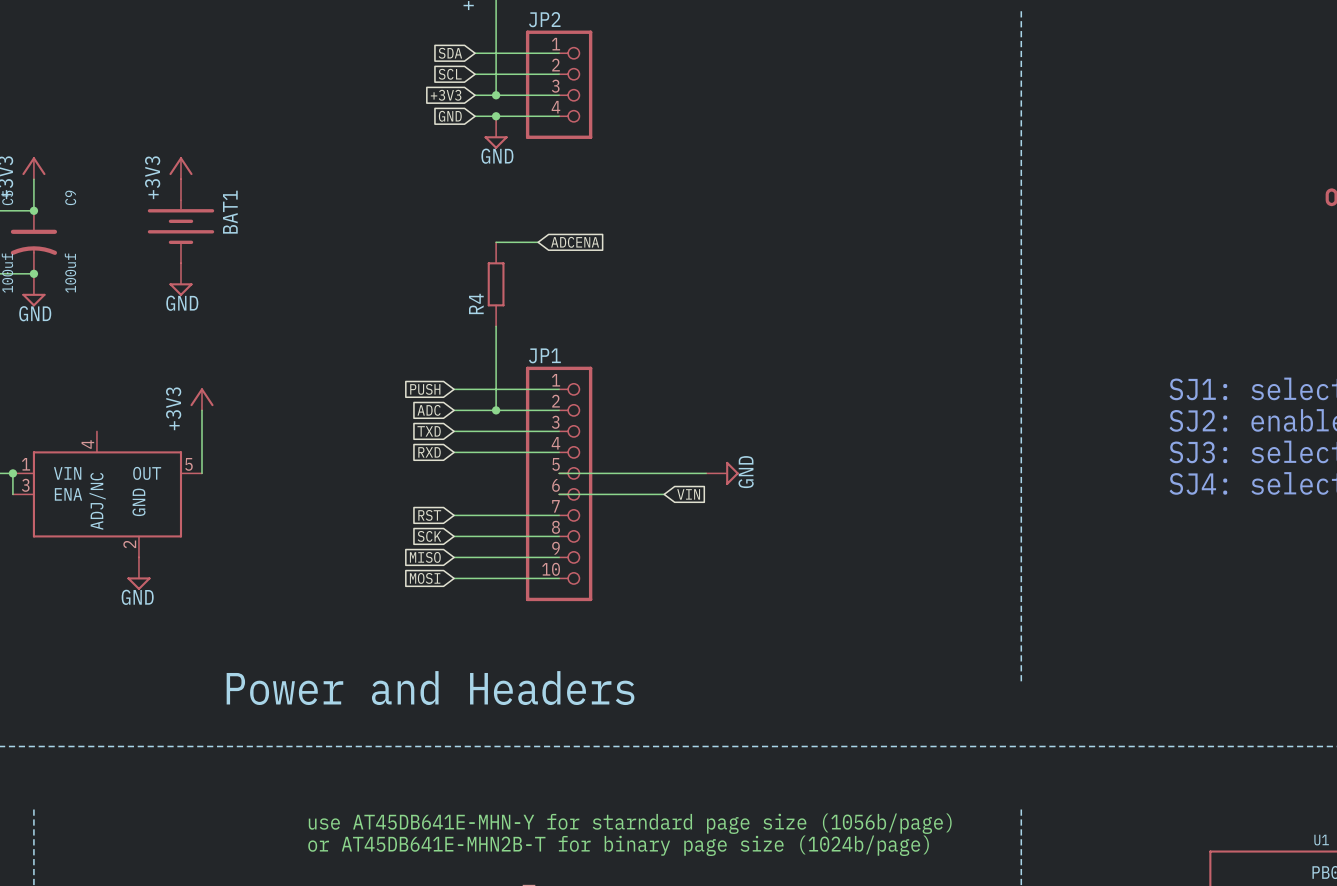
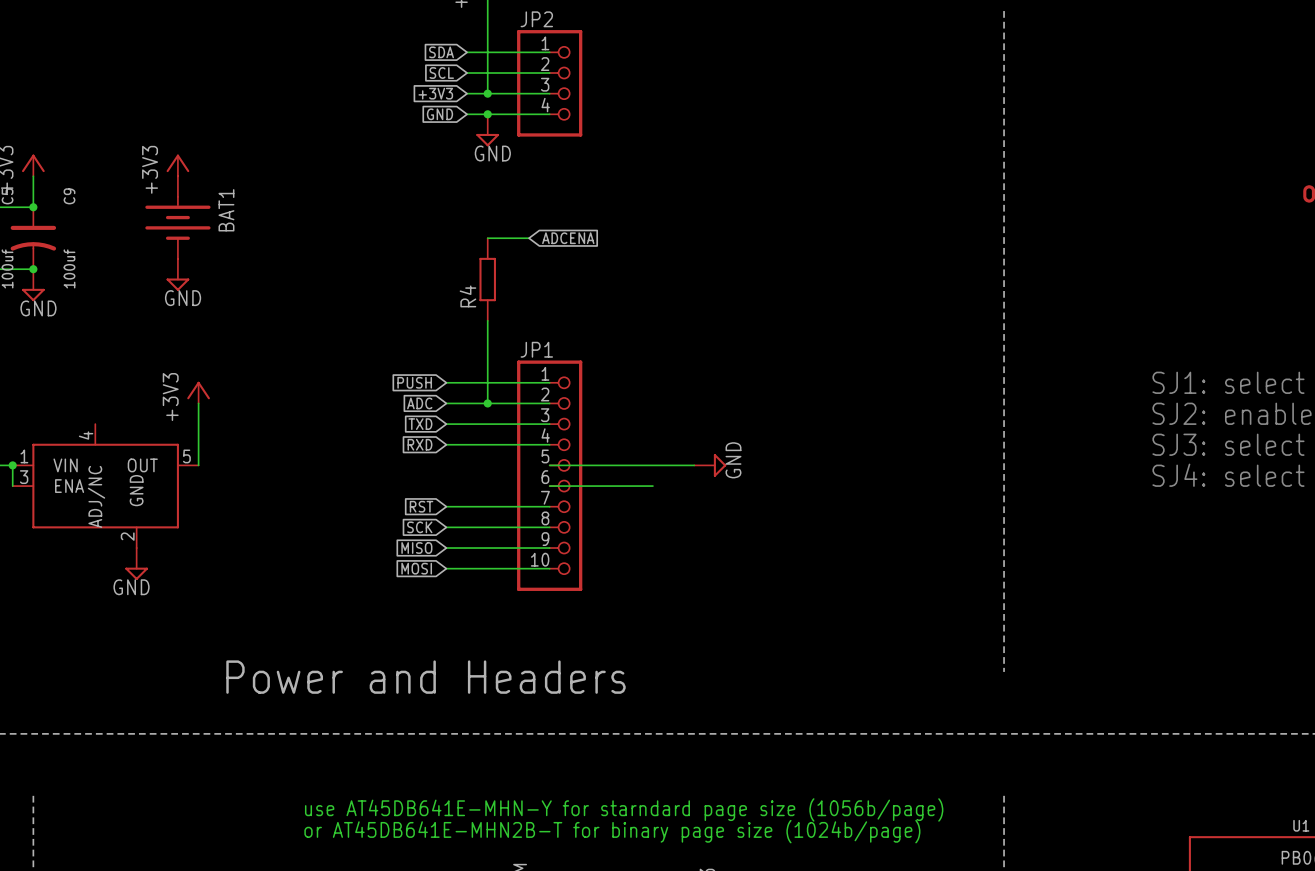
global label: VIN (688, 494) -> none

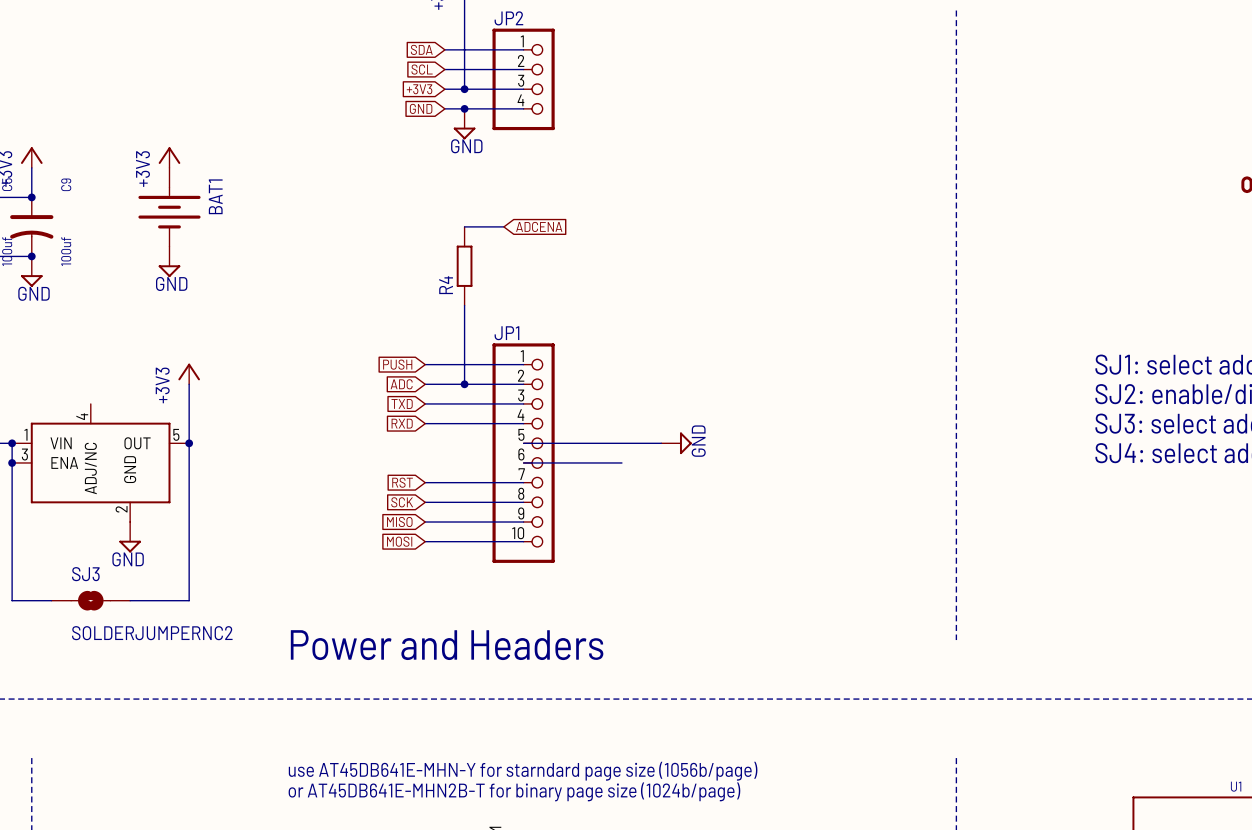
wire: none -> (189, 443) (189, 600) (130, 600)
junction: none -> (189, 443)
wire: none -> (12, 462) (12, 600) (51, 600)
junction: none -> (12, 462)
SJ3: none -> SOLDERJUMPERNC2 (90, 600)
text position: Power and Headers (425, 677) -> Power and Headers (447, 645)

